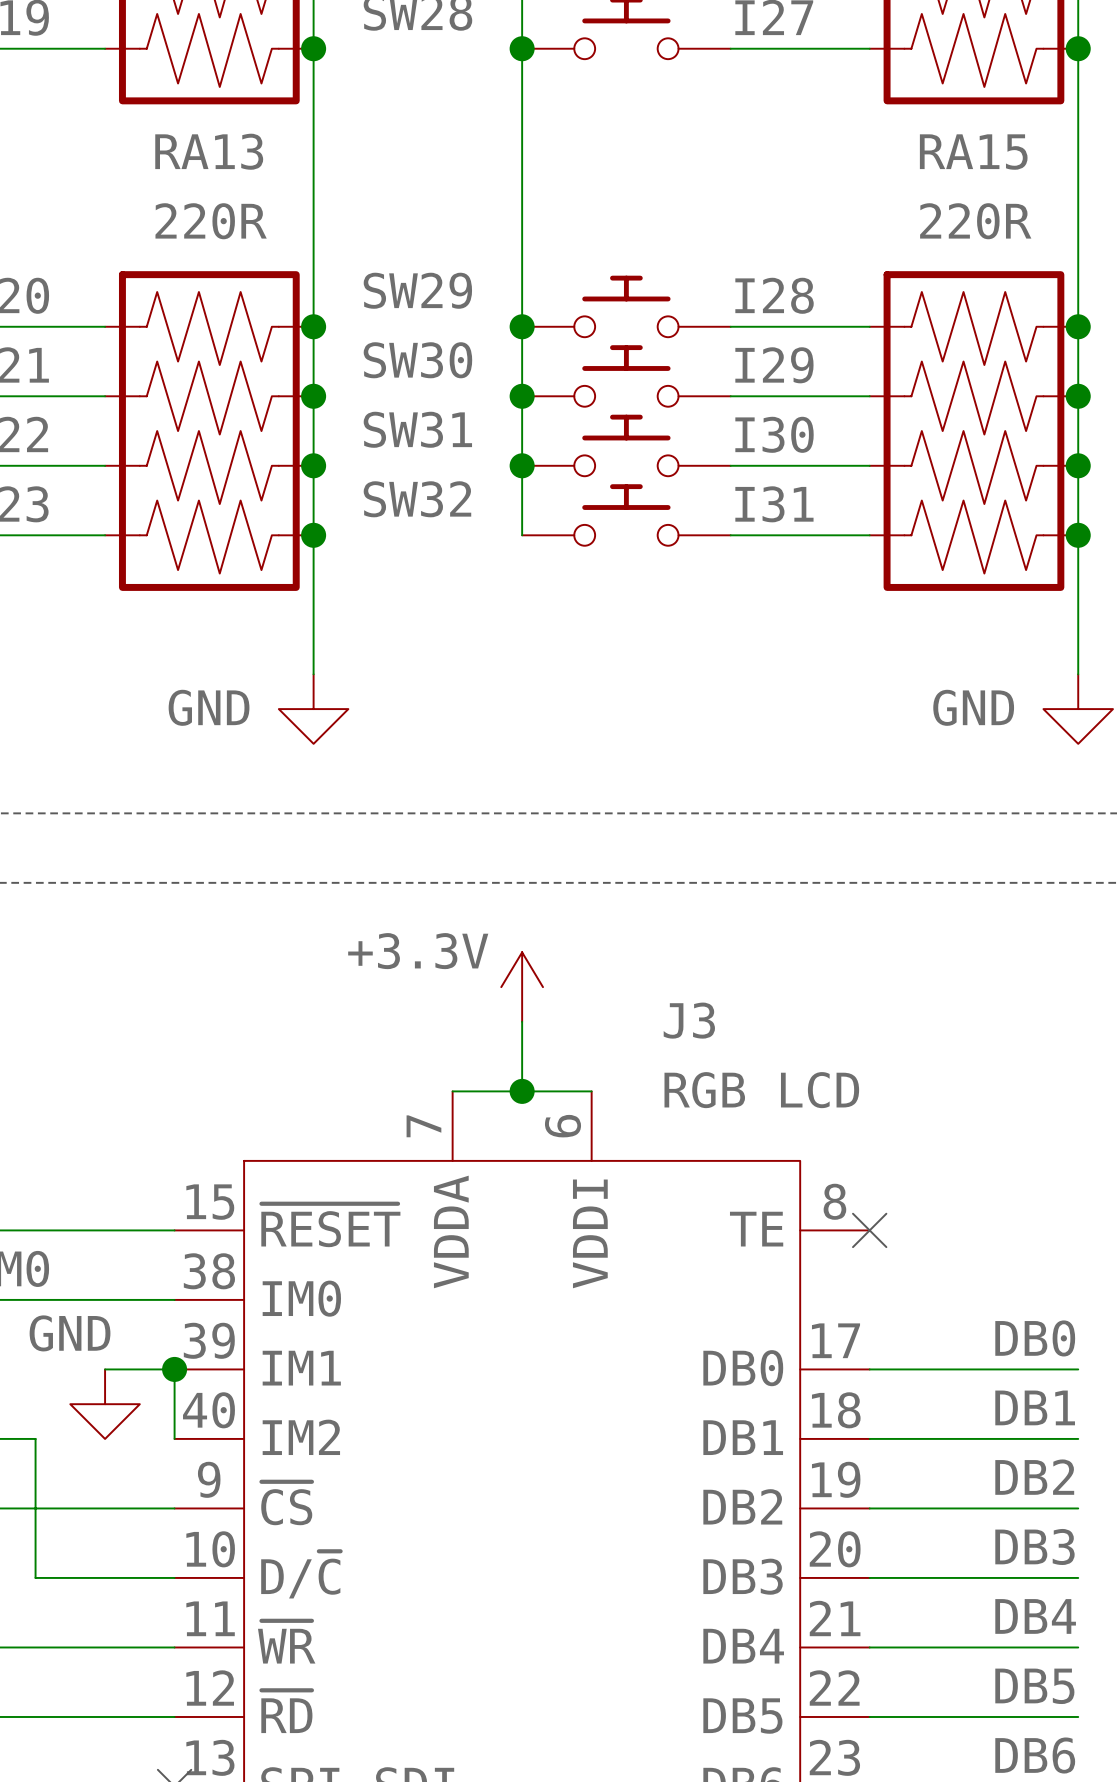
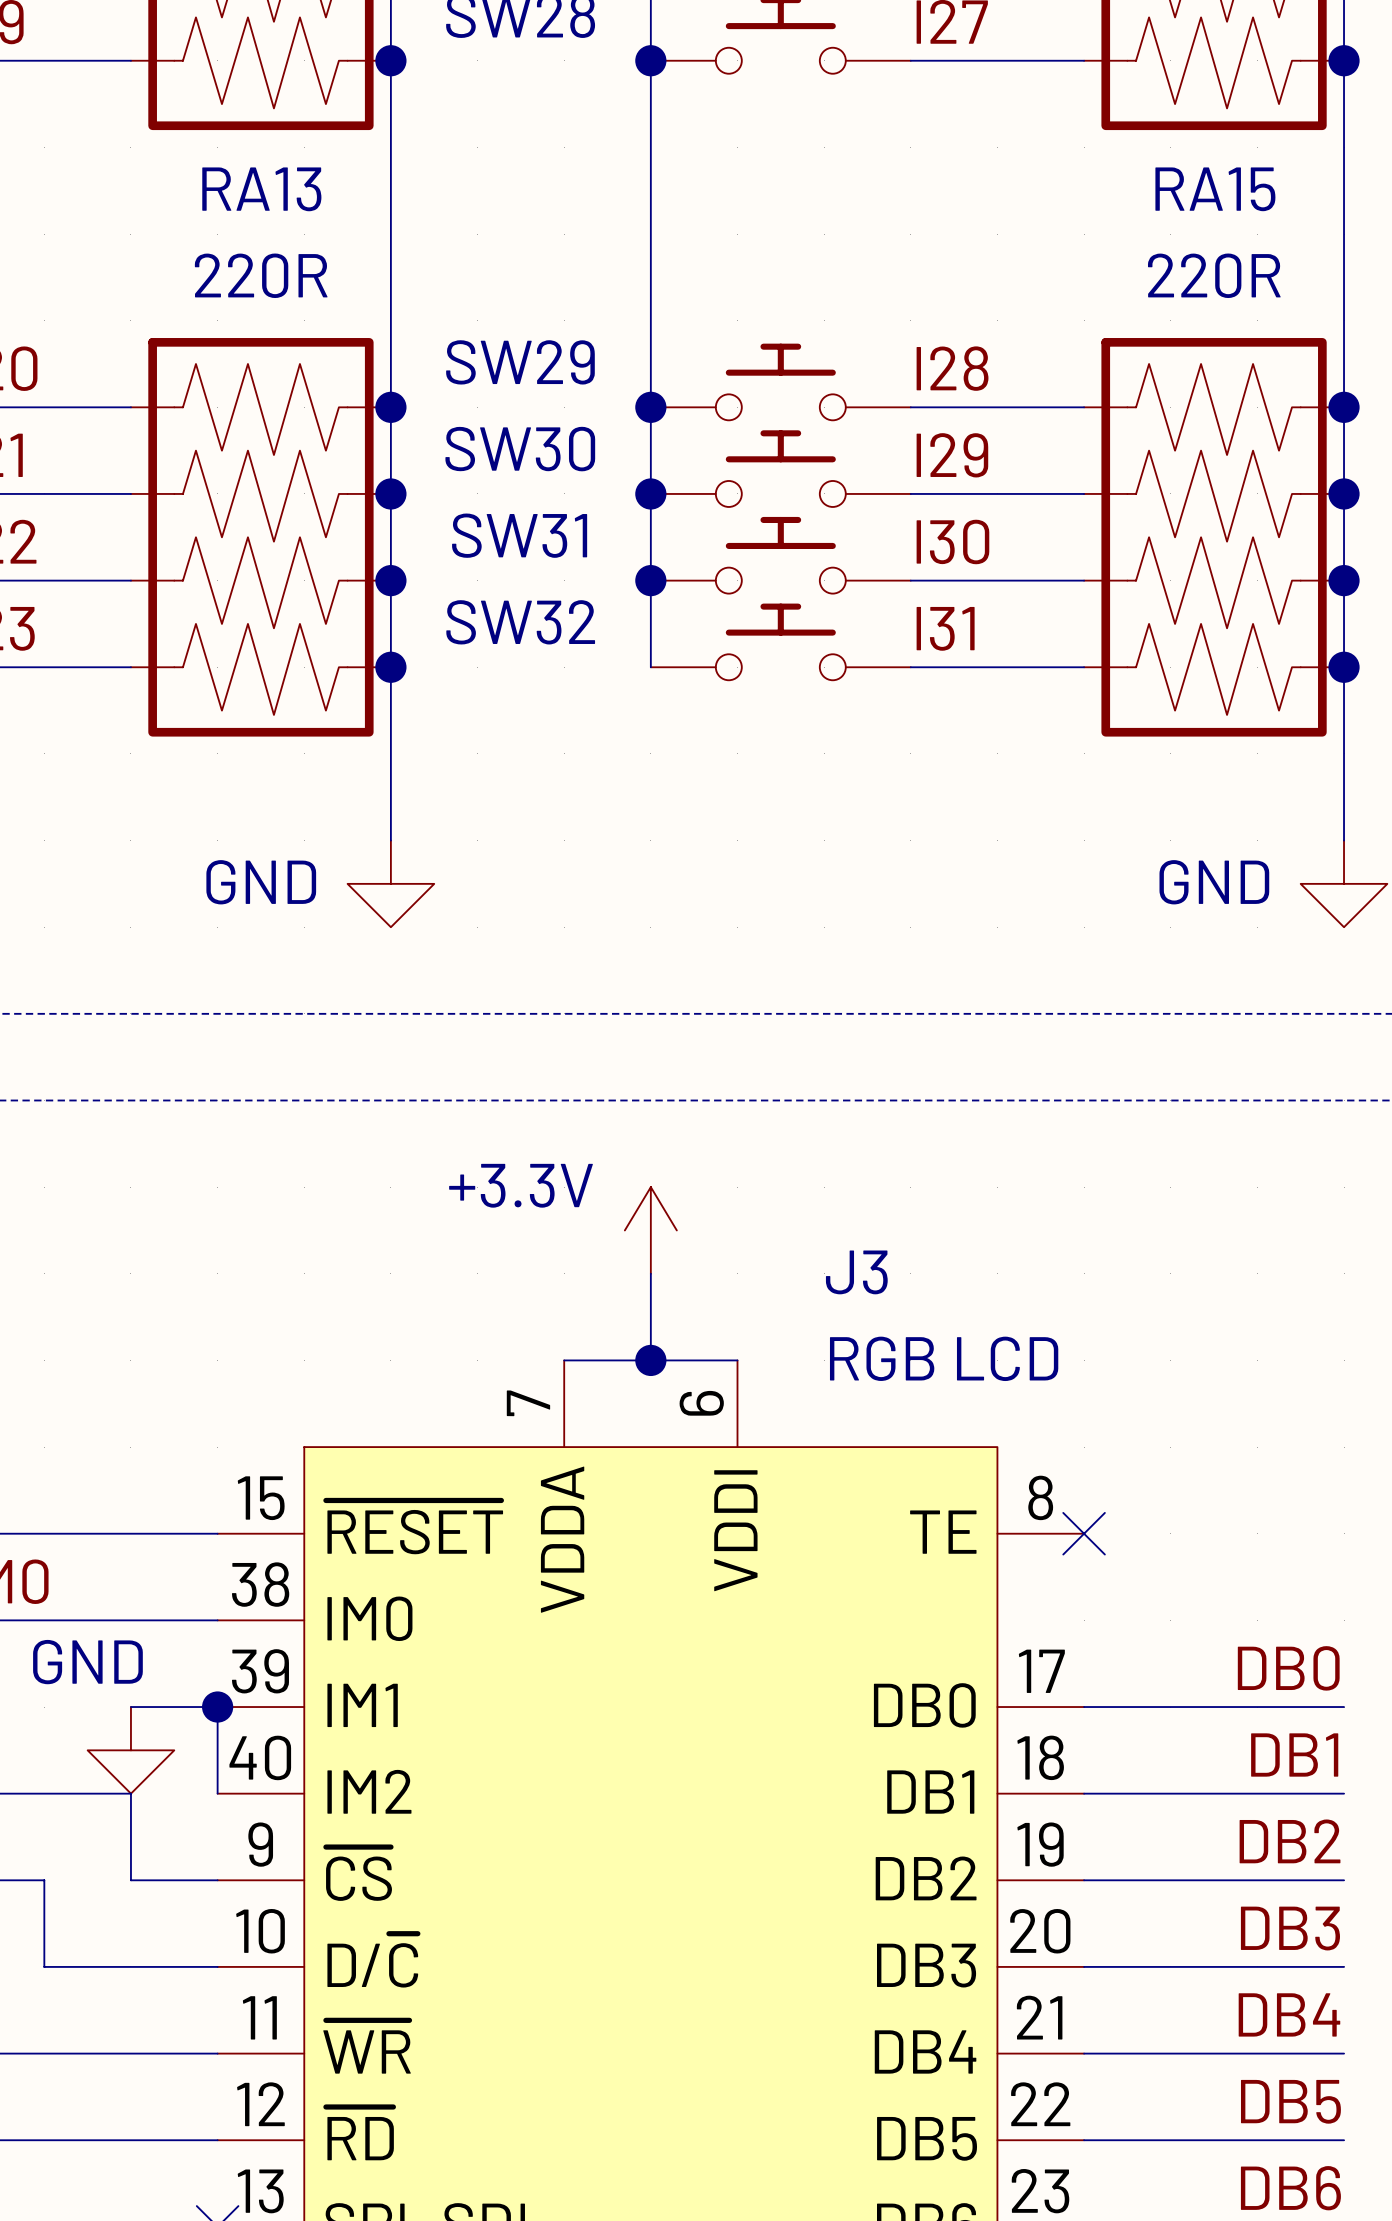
wire: (35, 1438) (35, 1508) (105, 1508) -> (44, 1793) (130, 1793) (130, 1880)

